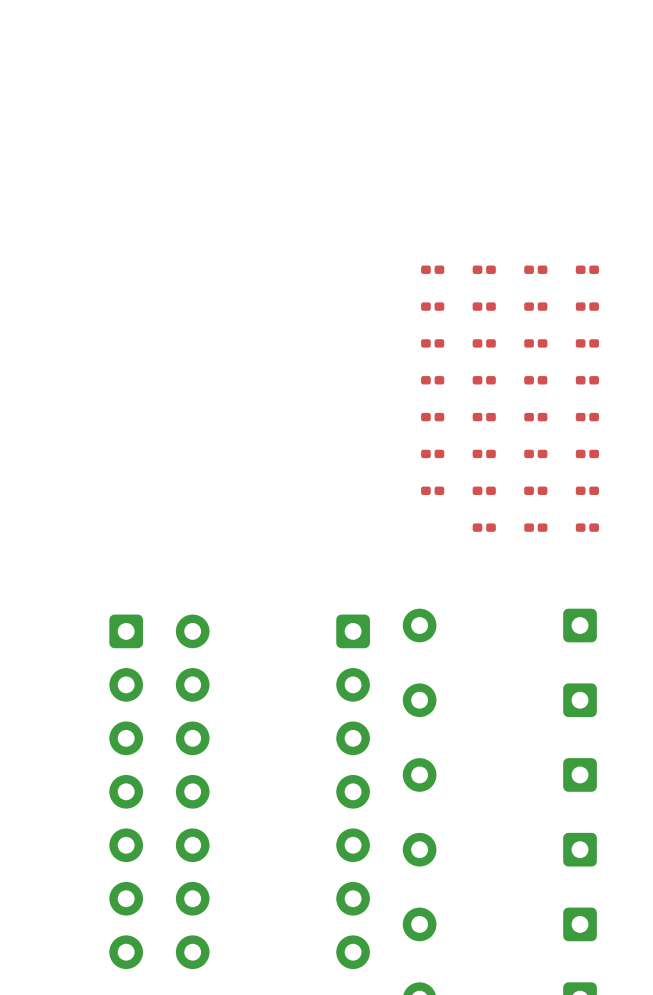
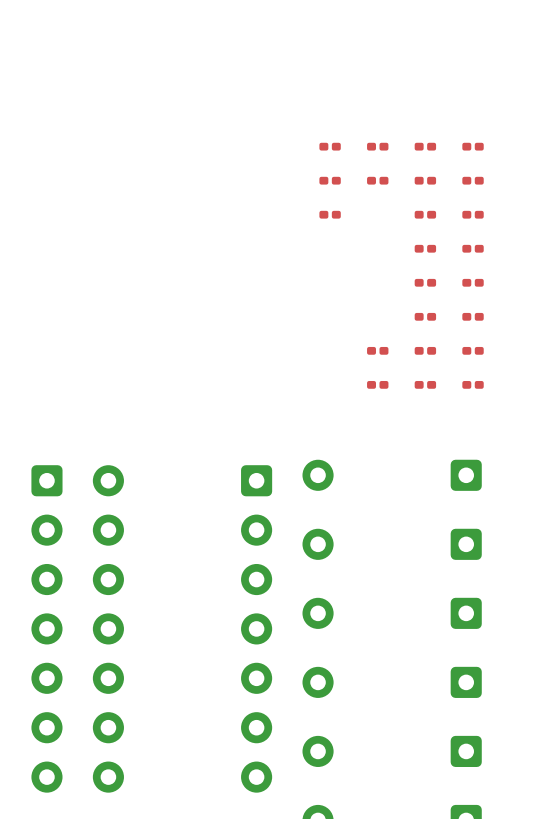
part: (484, 343) -> none
part: (432, 380) -> none
part: (484, 380) -> none
part: (432, 417) -> none
part: (484, 417) -> none
part: (432, 453) -> none
part: (484, 453) -> none
part: (432, 490) -> none

